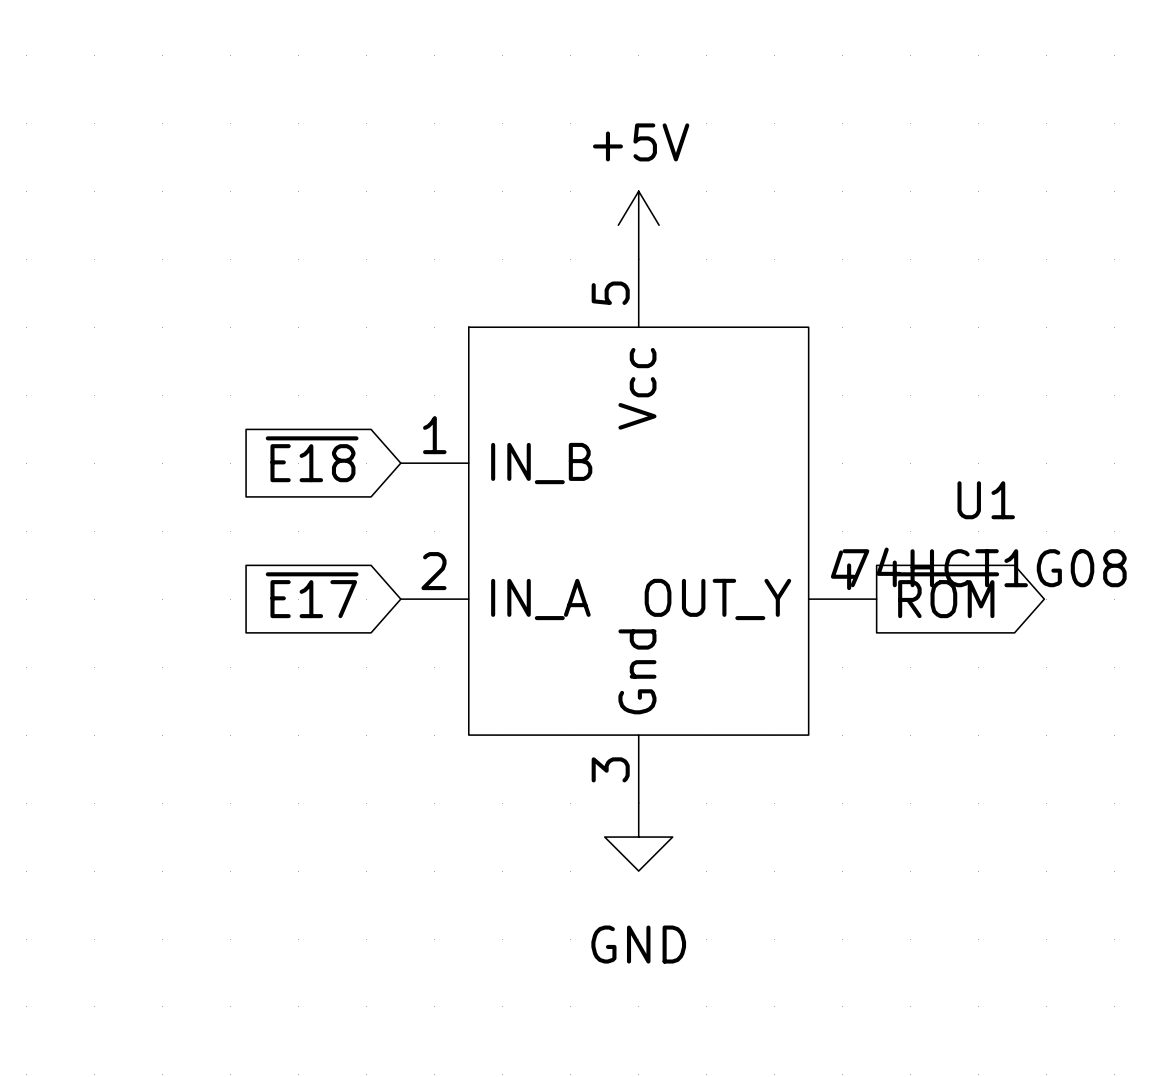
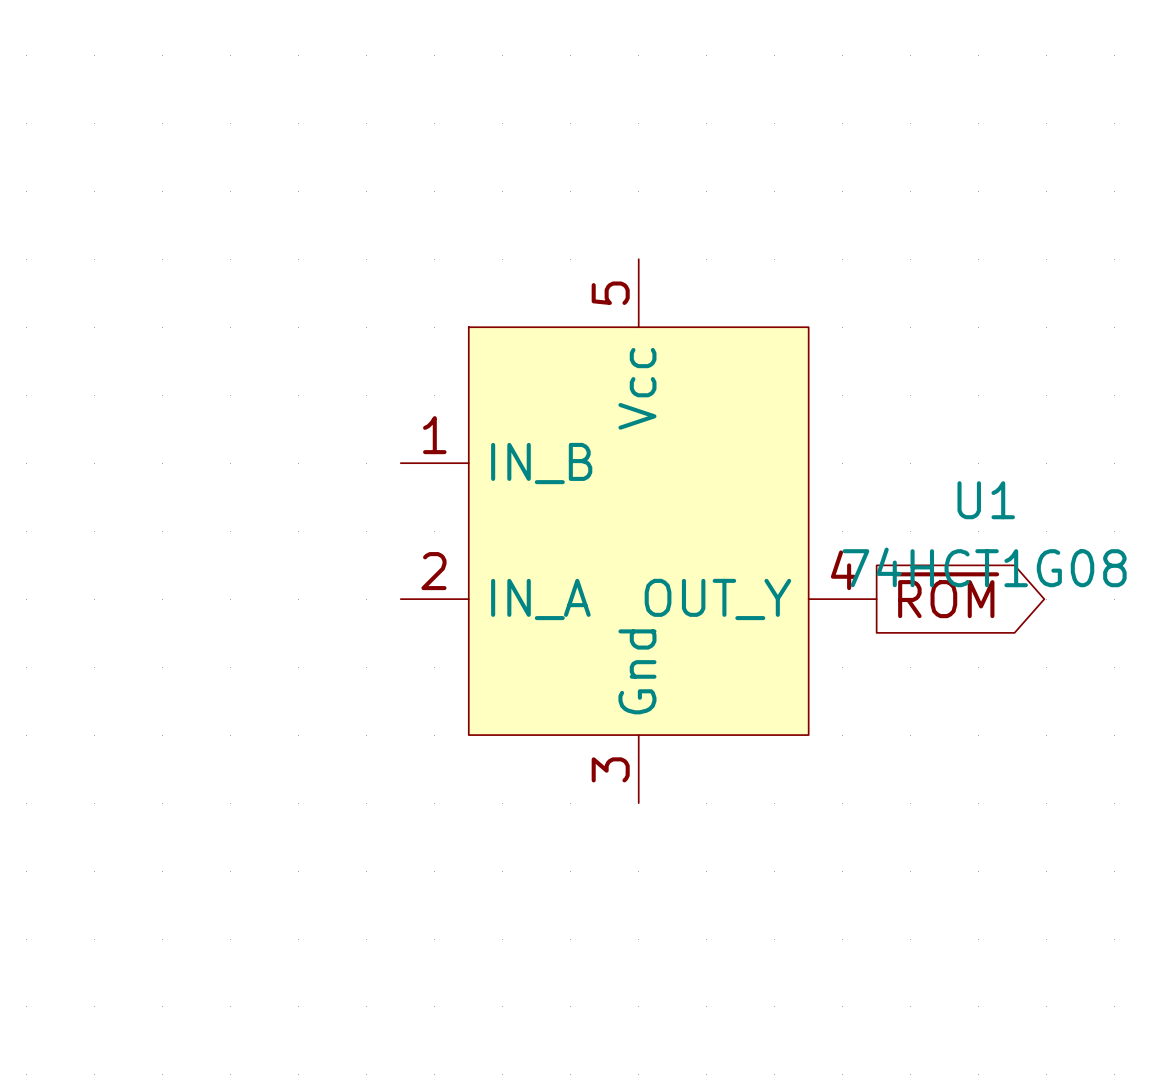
power symbol: +5V (638, 225) -> none
global label: ~{E18} (312, 459) -> none
global label: ~{E17} (312, 595) -> none
power symbol: GND (638, 837) -> none

